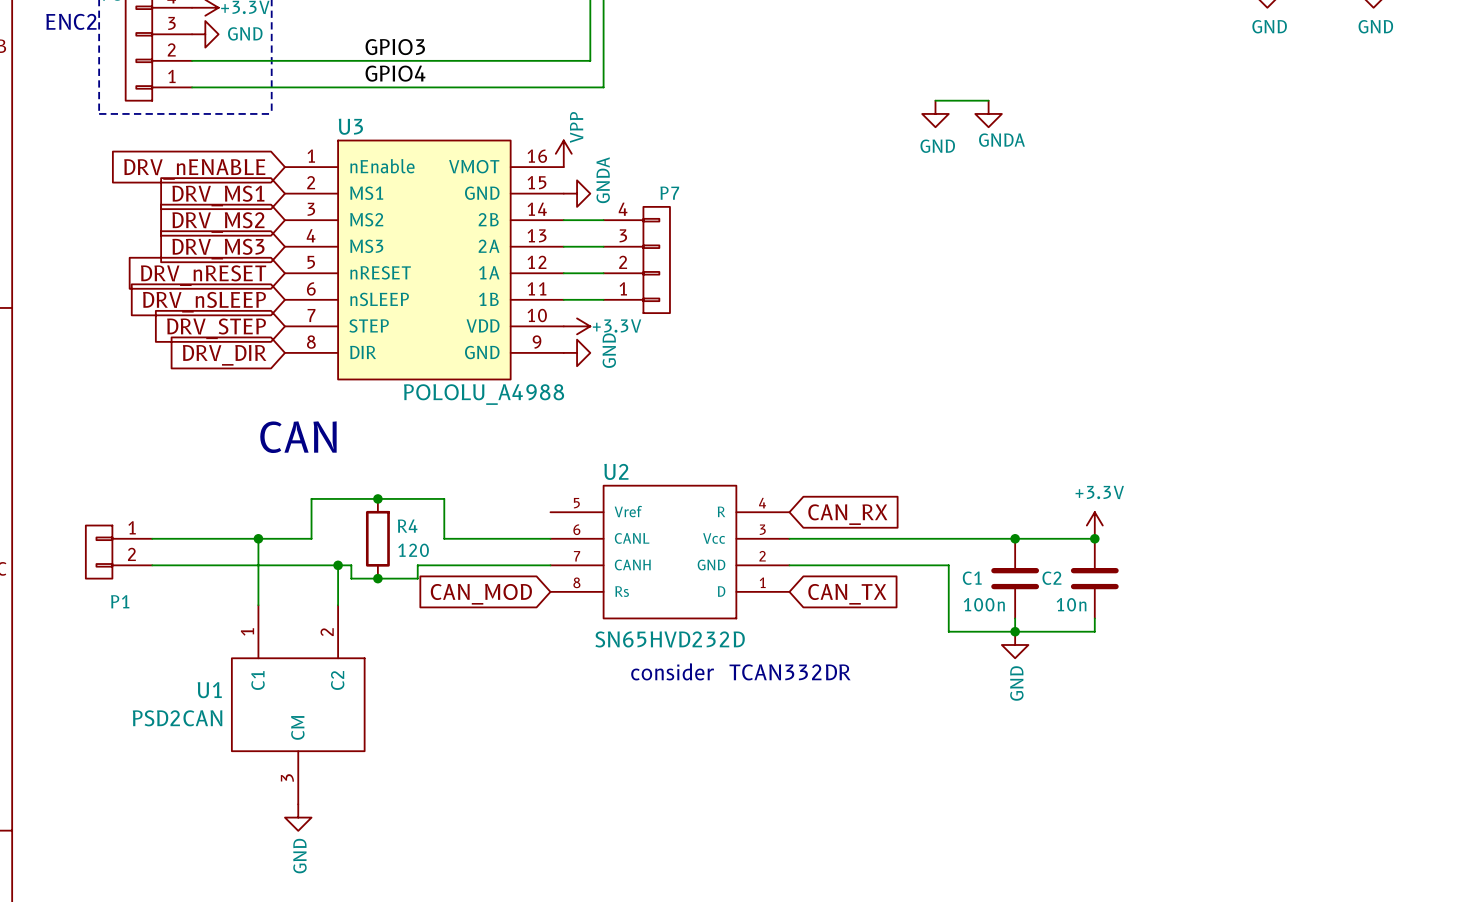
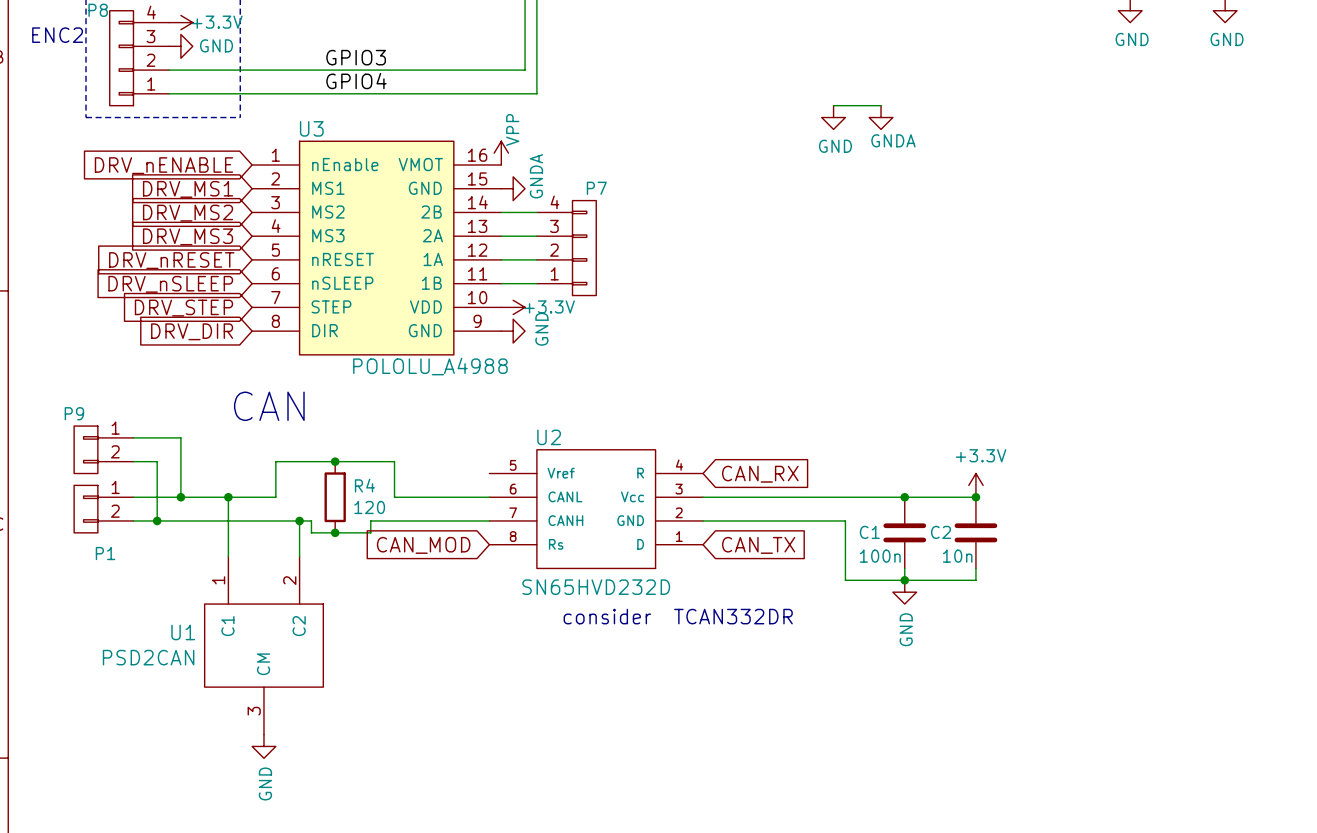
wire: none -> (133, 437) (180, 437) (180, 497)
P9: none -> (103, 449)
wire: none -> (133, 461) (157, 461) (157, 520)
junction: none -> (180, 497)
junction: none -> (157, 520)

